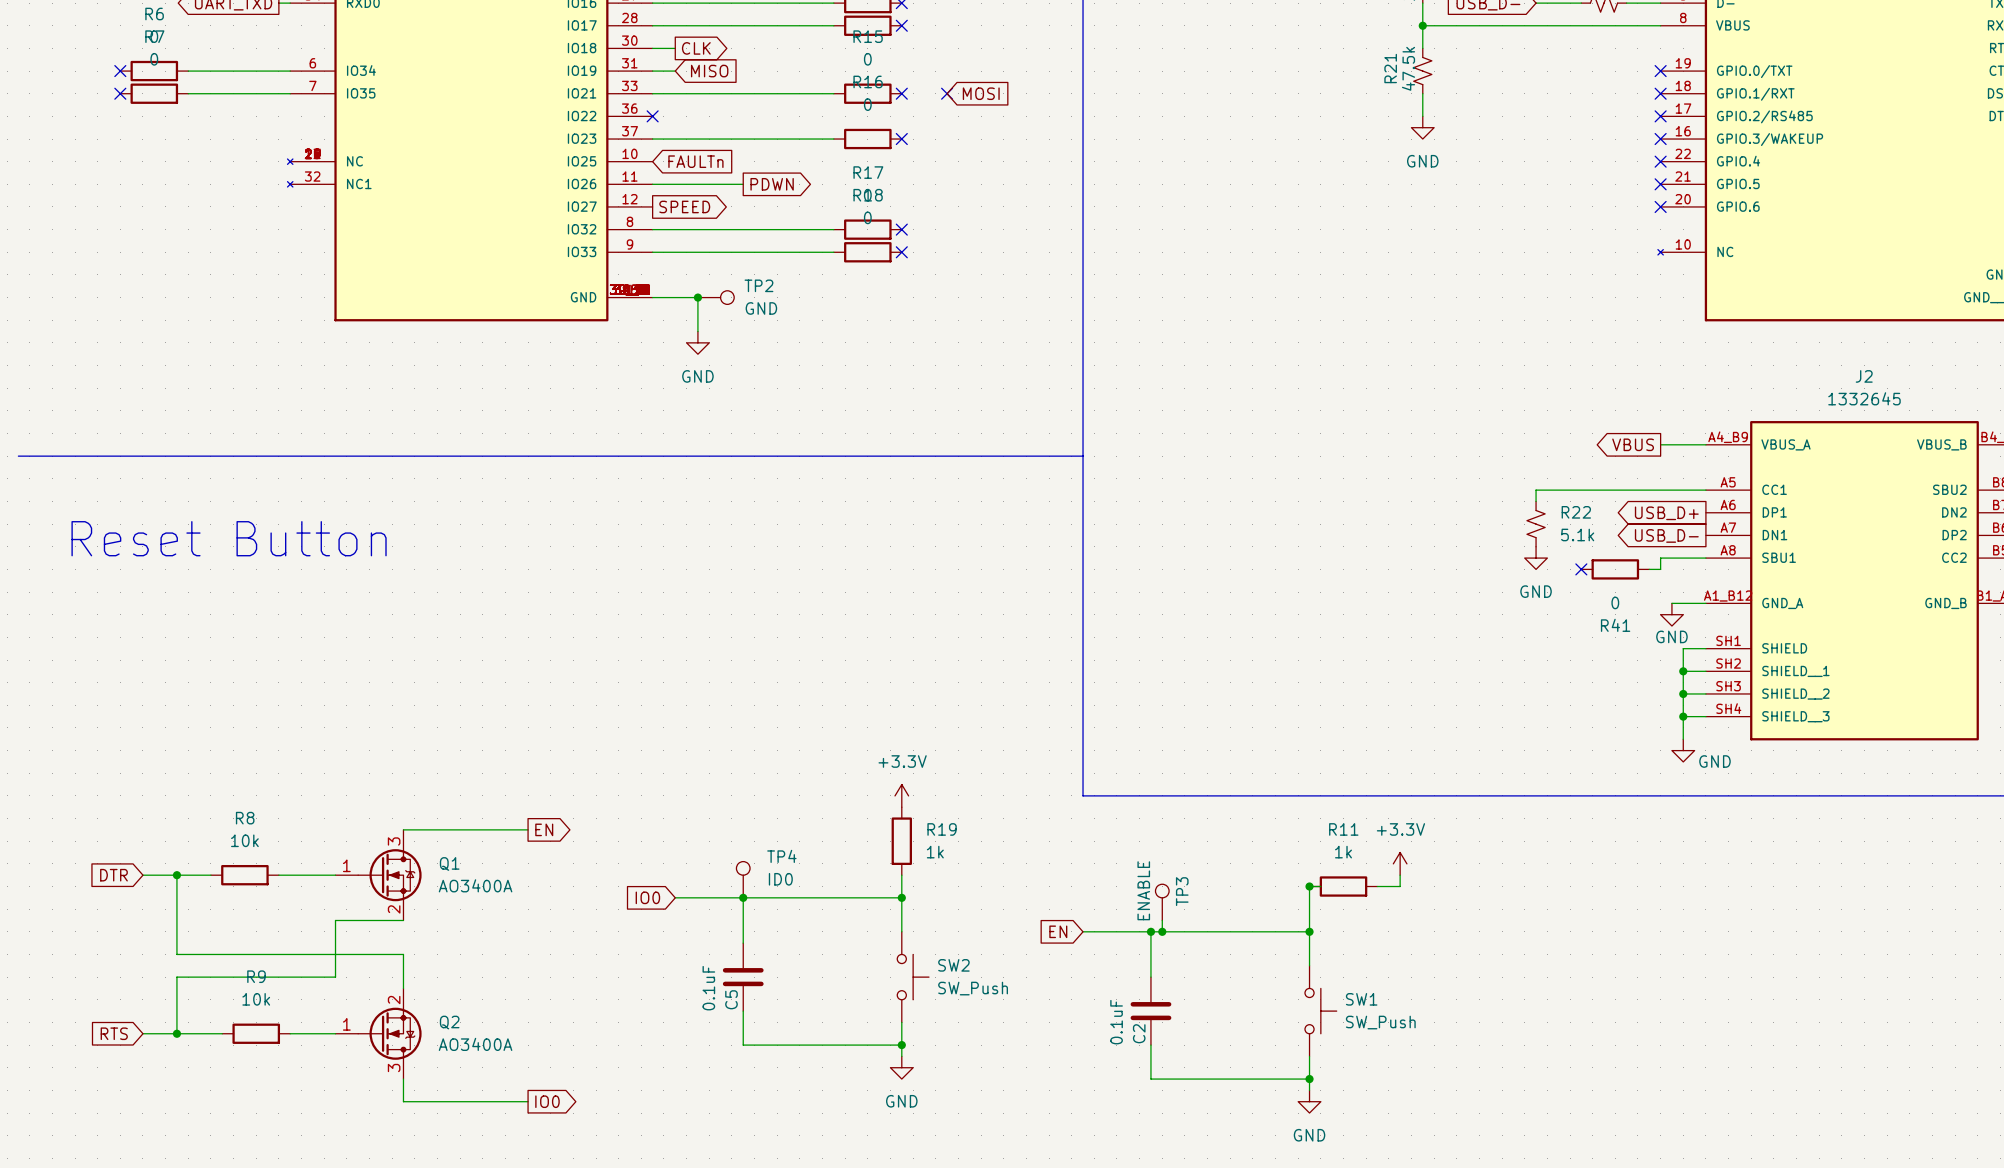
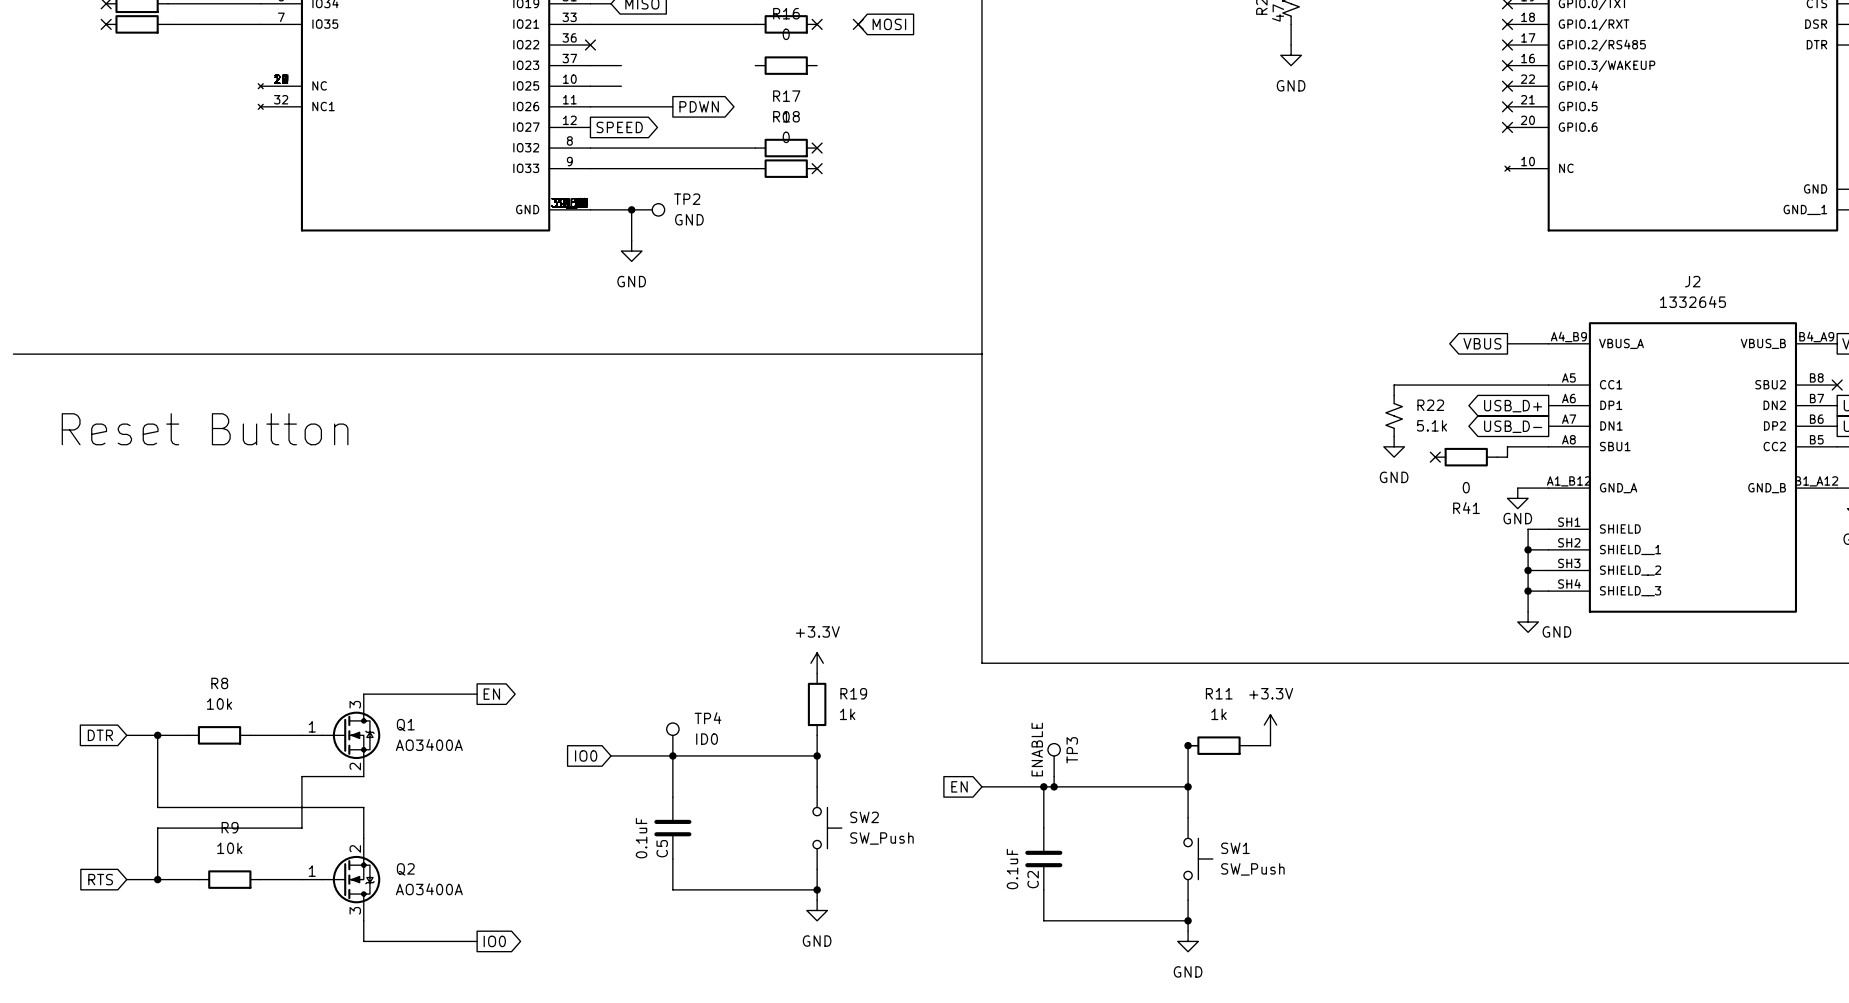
wire: (686, 139) (833, 139) -> none
no-connect mark: (901, 139) -> none
wire: none -> (590, 86) (621, 86)
global label: FAULTn (695, 161) -> none

